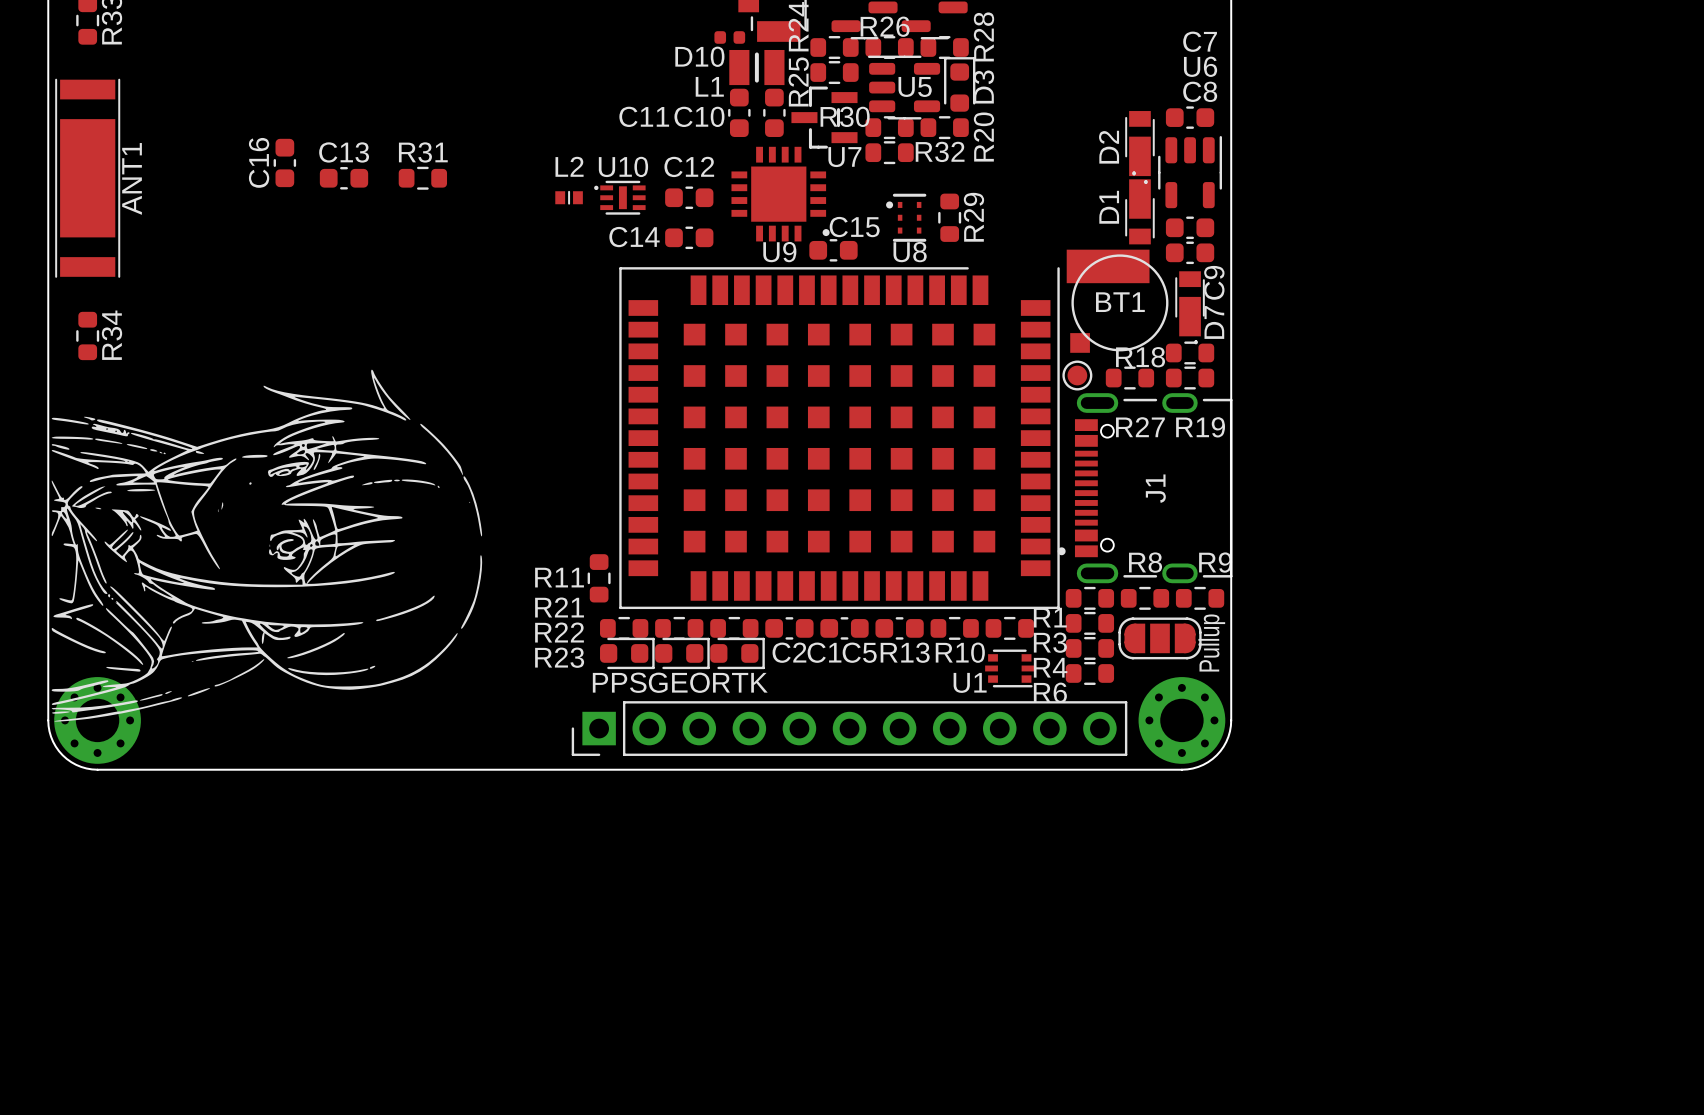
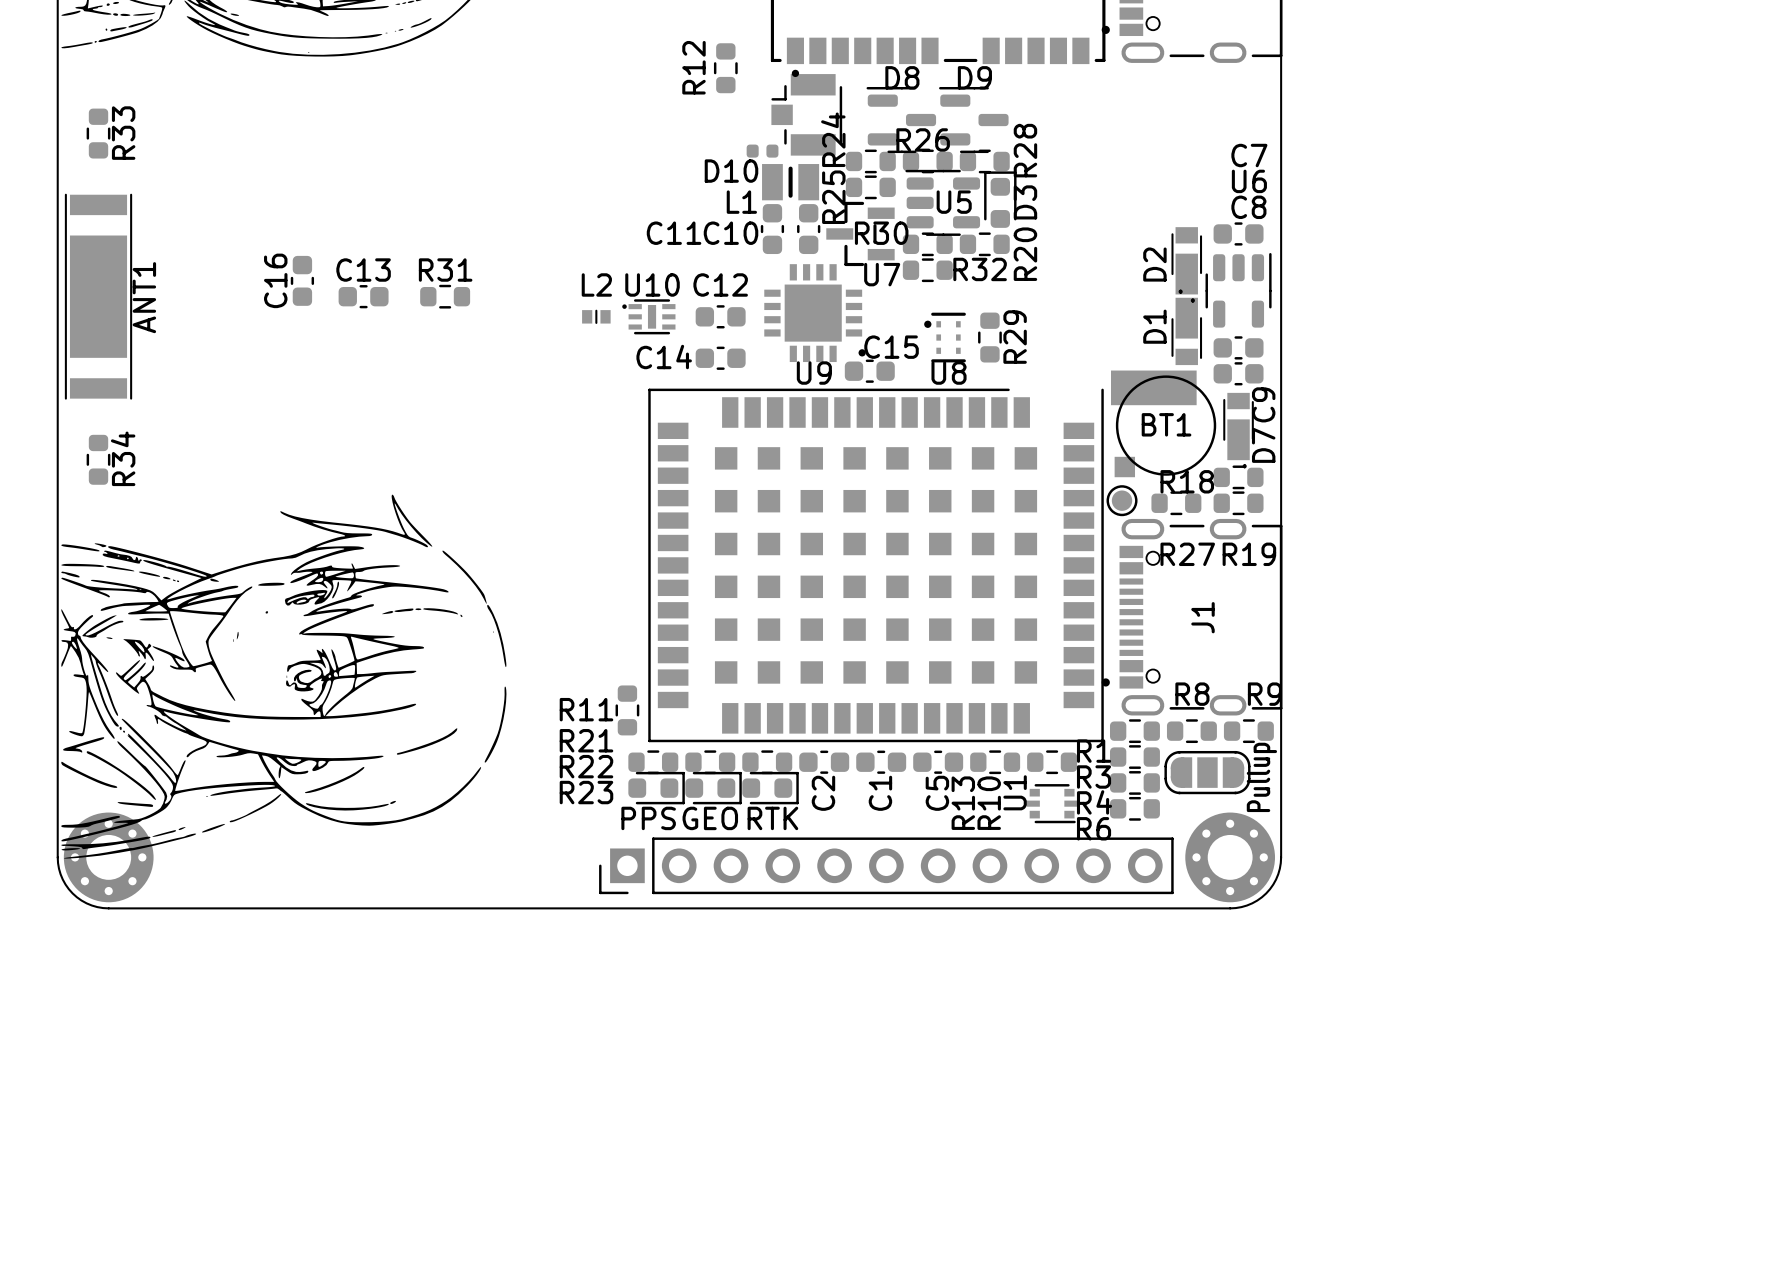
C2 name rotation: 0° (789, 652) -> 90° counterclockwise (823, 793)
C1 name rotation: 0° (824, 652) -> 90° counterclockwise (880, 793)
C5 name rotation: 0° (859, 652) -> 90° counterclockwise (937, 793)
R13 name rotation: 0° (905, 652) -> 90° counterclockwise (963, 803)
R10 name rotation: 0° (960, 652) -> 90° counterclockwise (989, 803)
U1 name rotation: 0° (970, 682) -> 90° counterclockwise (1015, 792)

